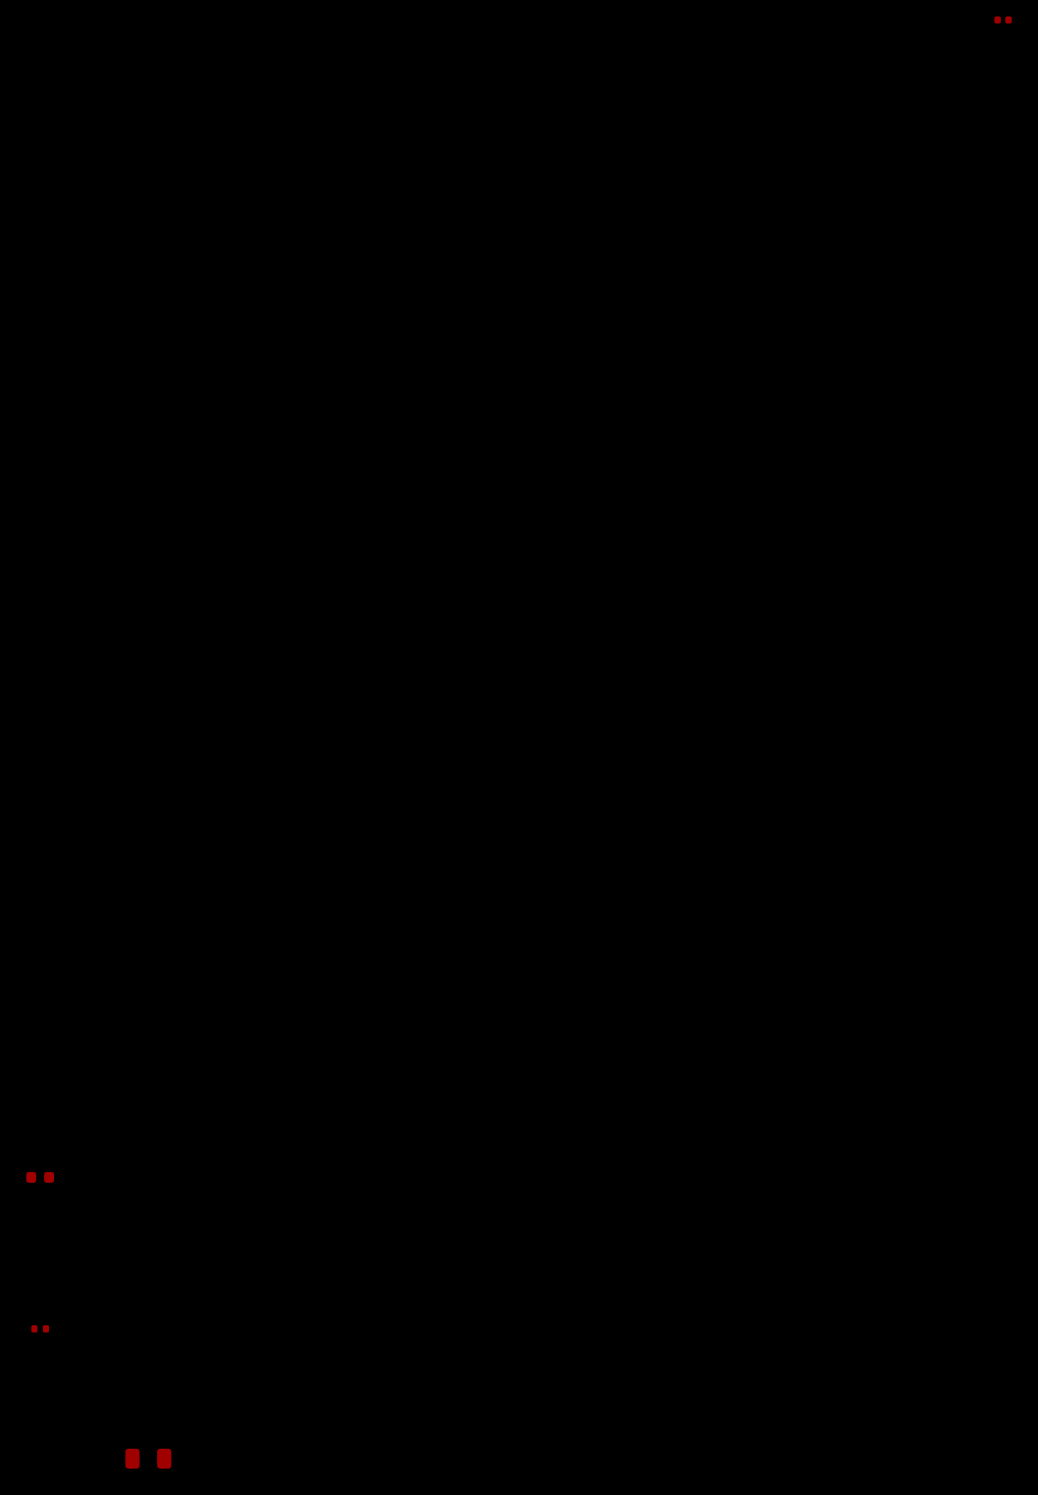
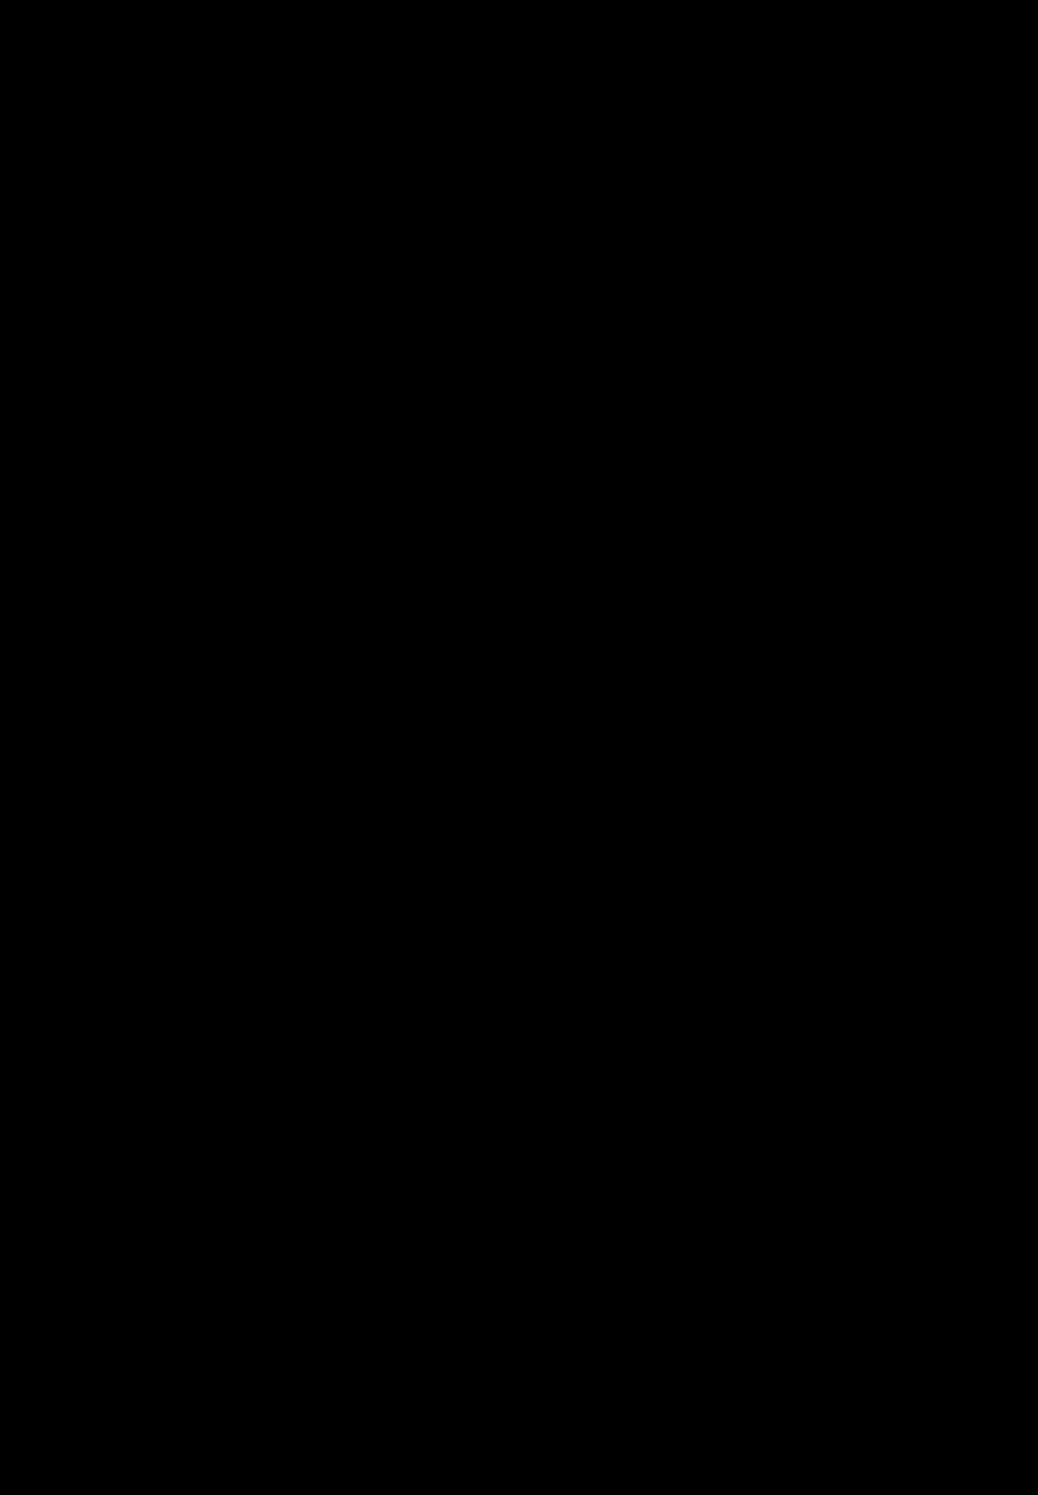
part: (1003, 19) -> none
part: (40, 1177) -> none
part: (40, 1328) -> none
part: (148, 1458) -> none

